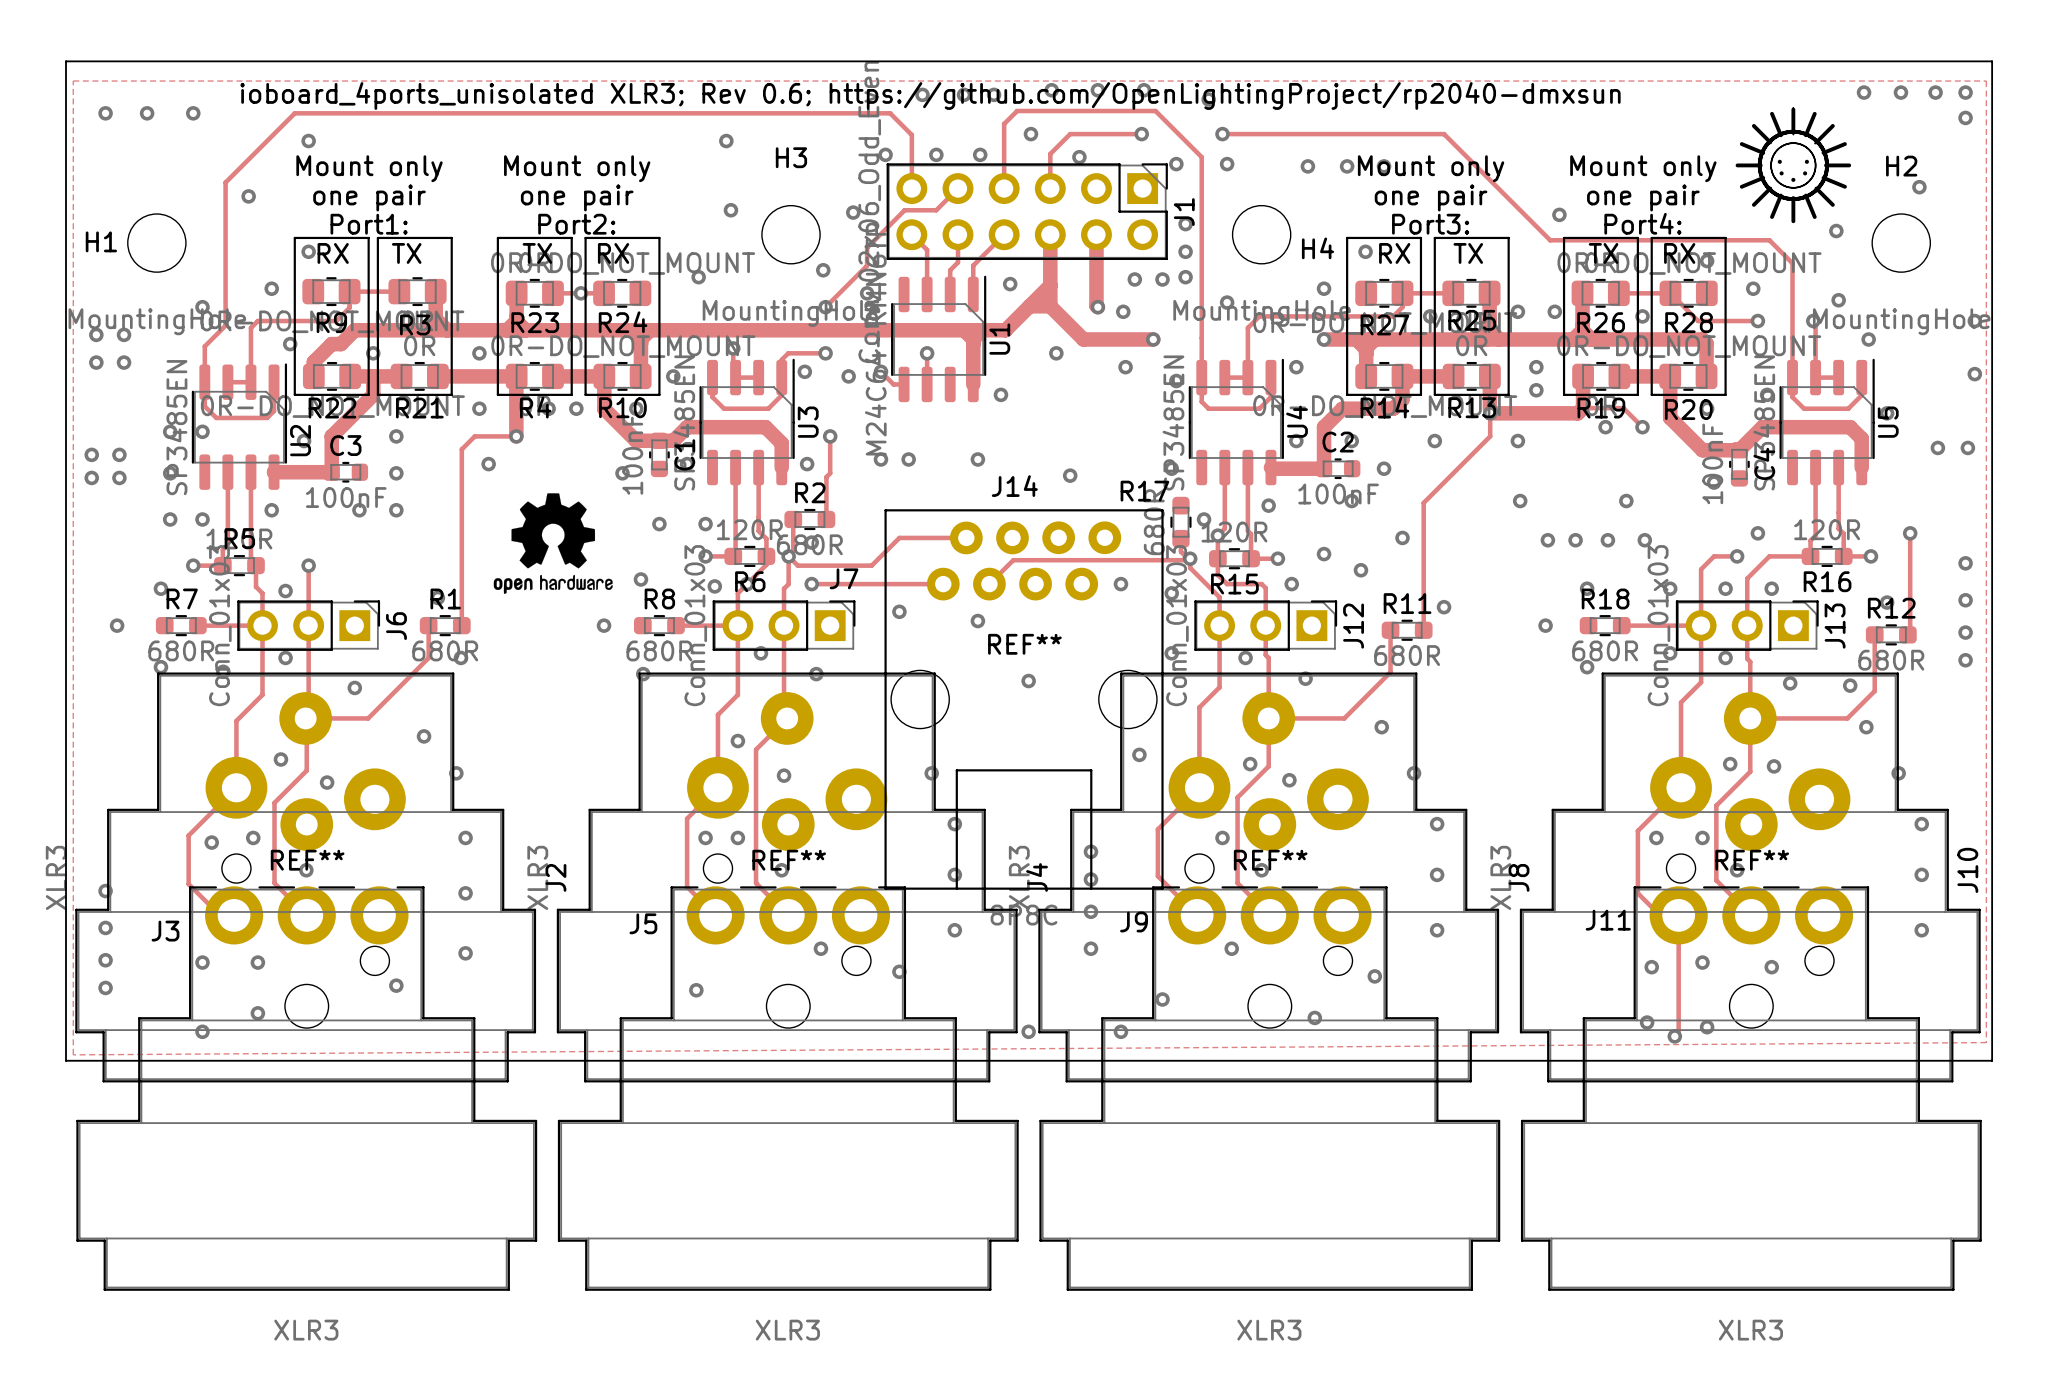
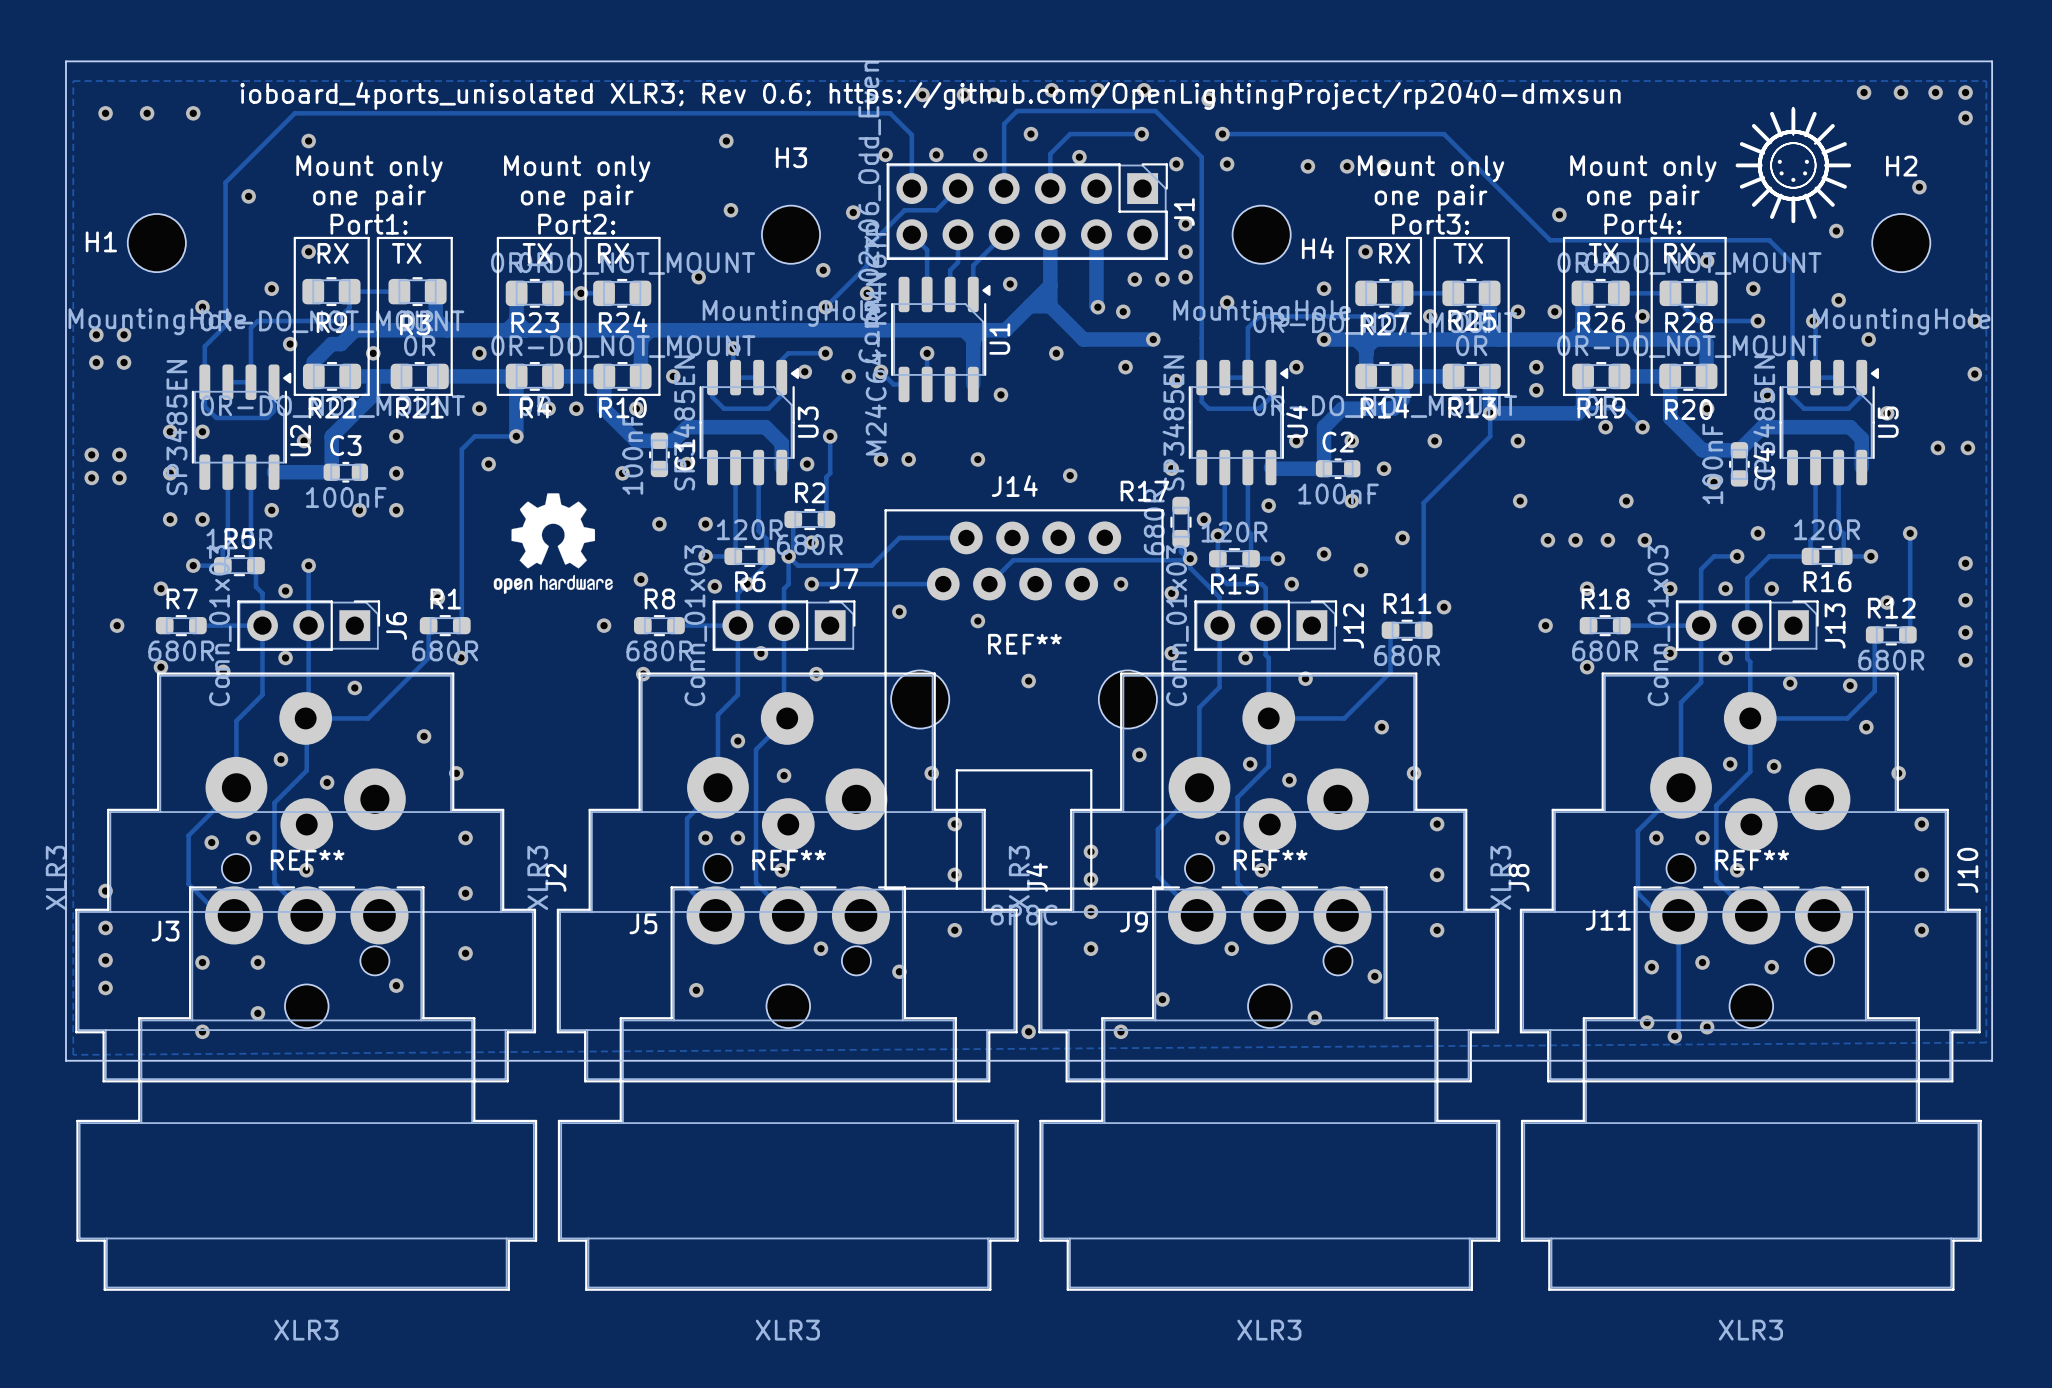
U1 footprint: [891, 275, 987, 403] -> [891, 276, 991, 403]
U3 footprint: [699, 358, 795, 486] -> [699, 359, 799, 486]
U4 footprint: [1188, 358, 1284, 486] -> [1188, 359, 1289, 486]
U5 footprint: [1779, 358, 1875, 486] -> [1779, 359, 1880, 486]
U2 footprint: [191, 363, 288, 490] -> [191, 364, 292, 490]

